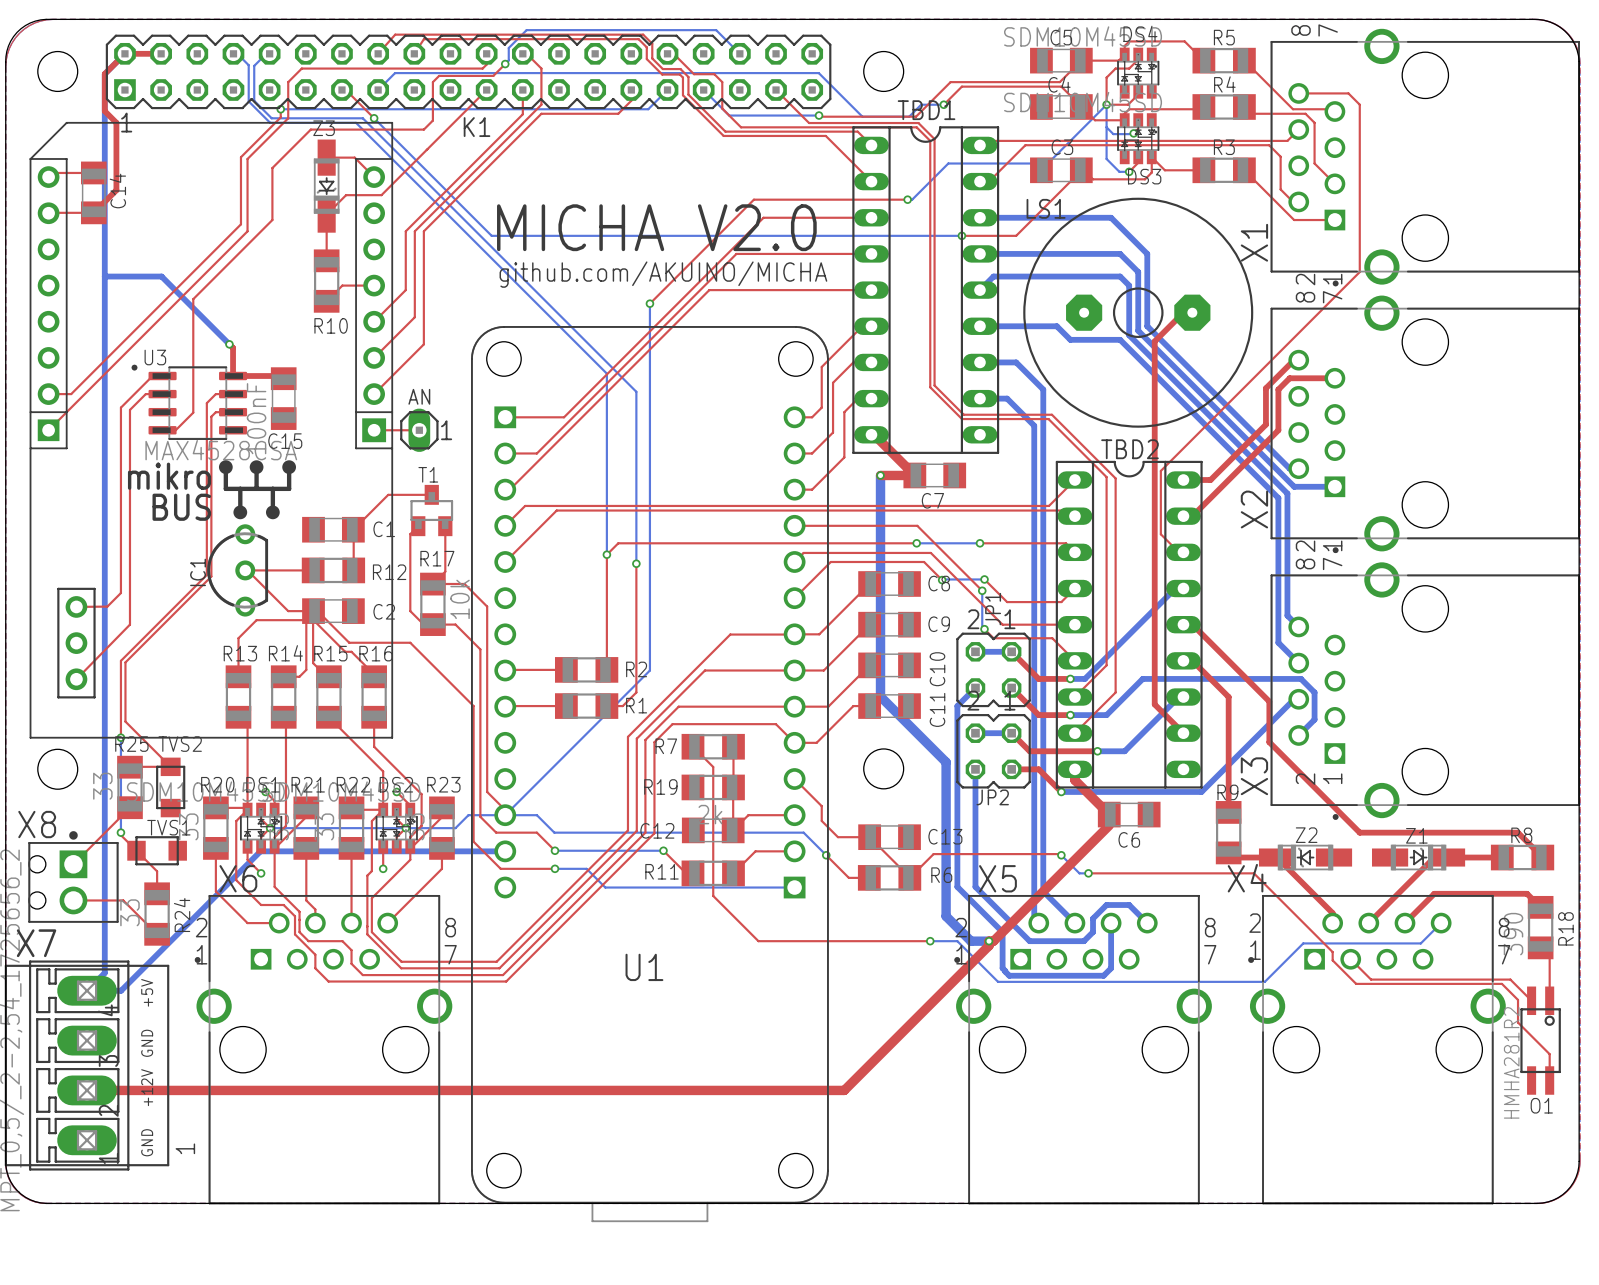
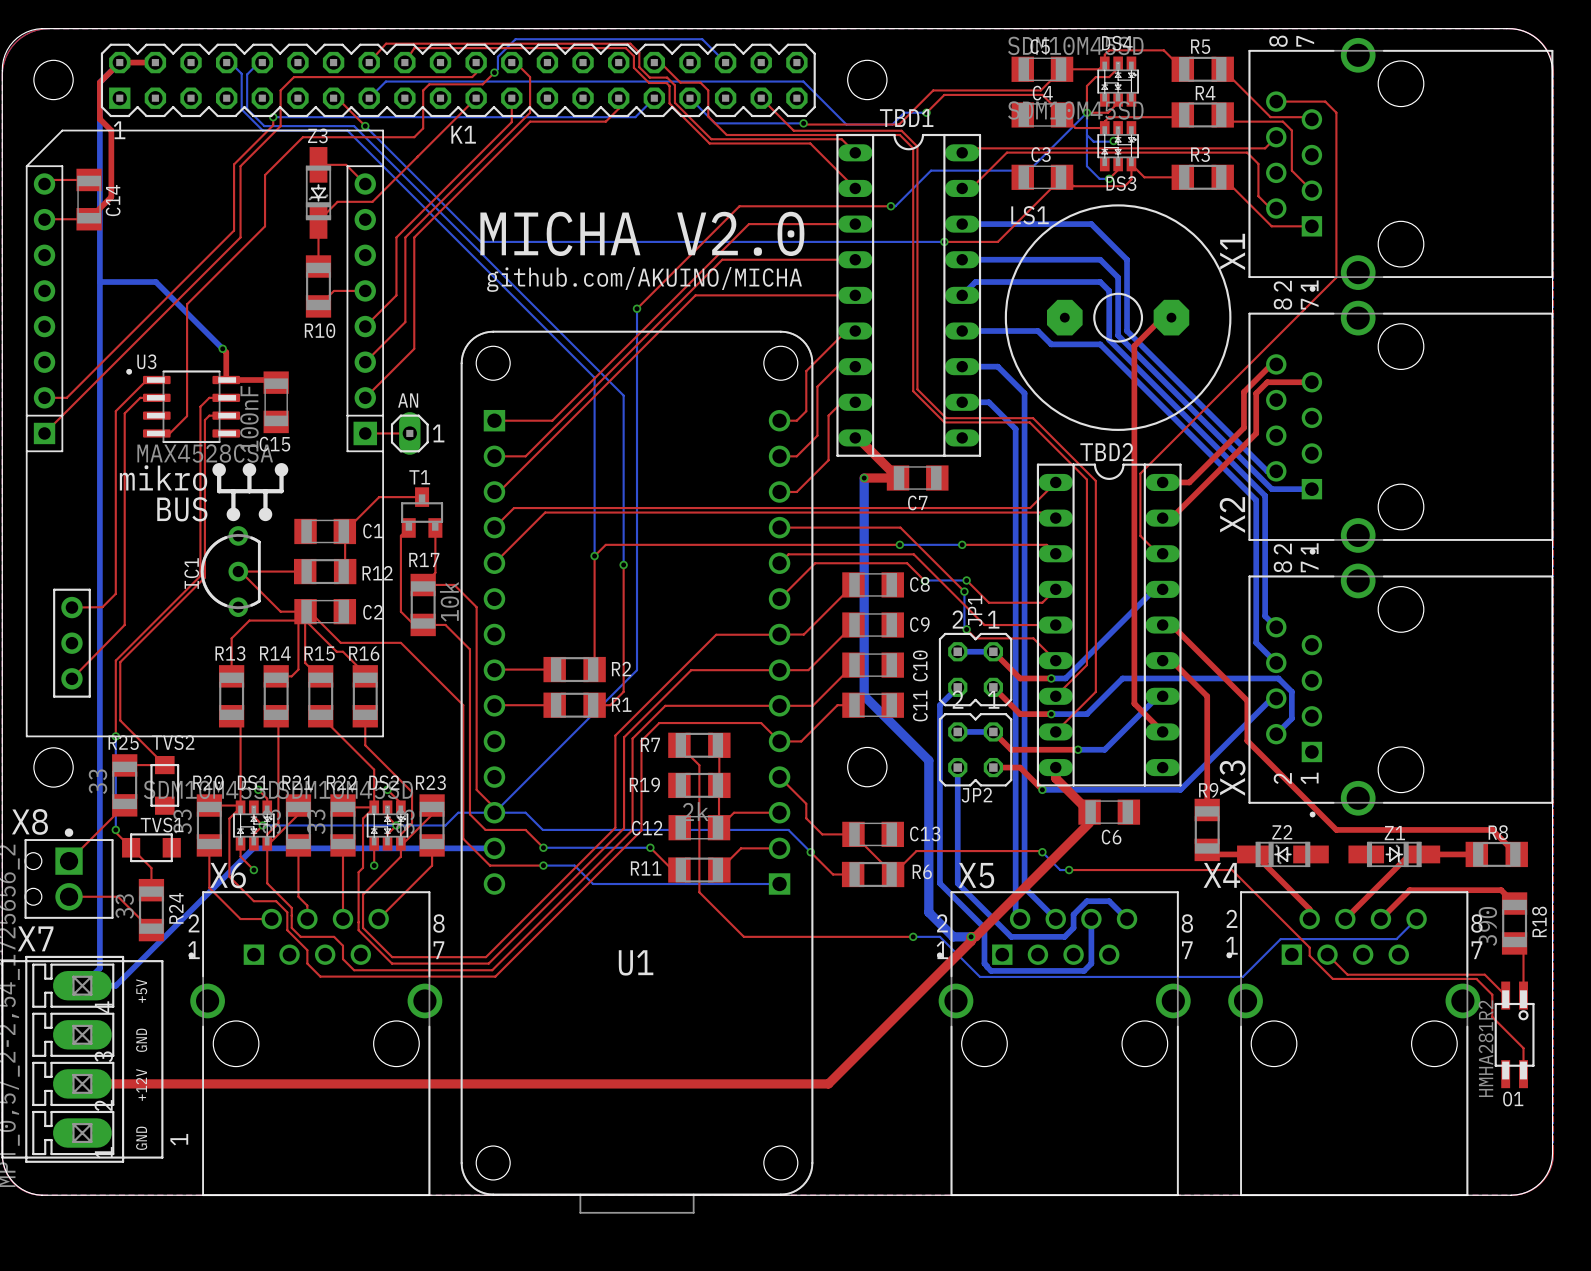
O1 footprint: [1520, 986, 1561, 1095] -> [1494, 981, 1535, 1089]

